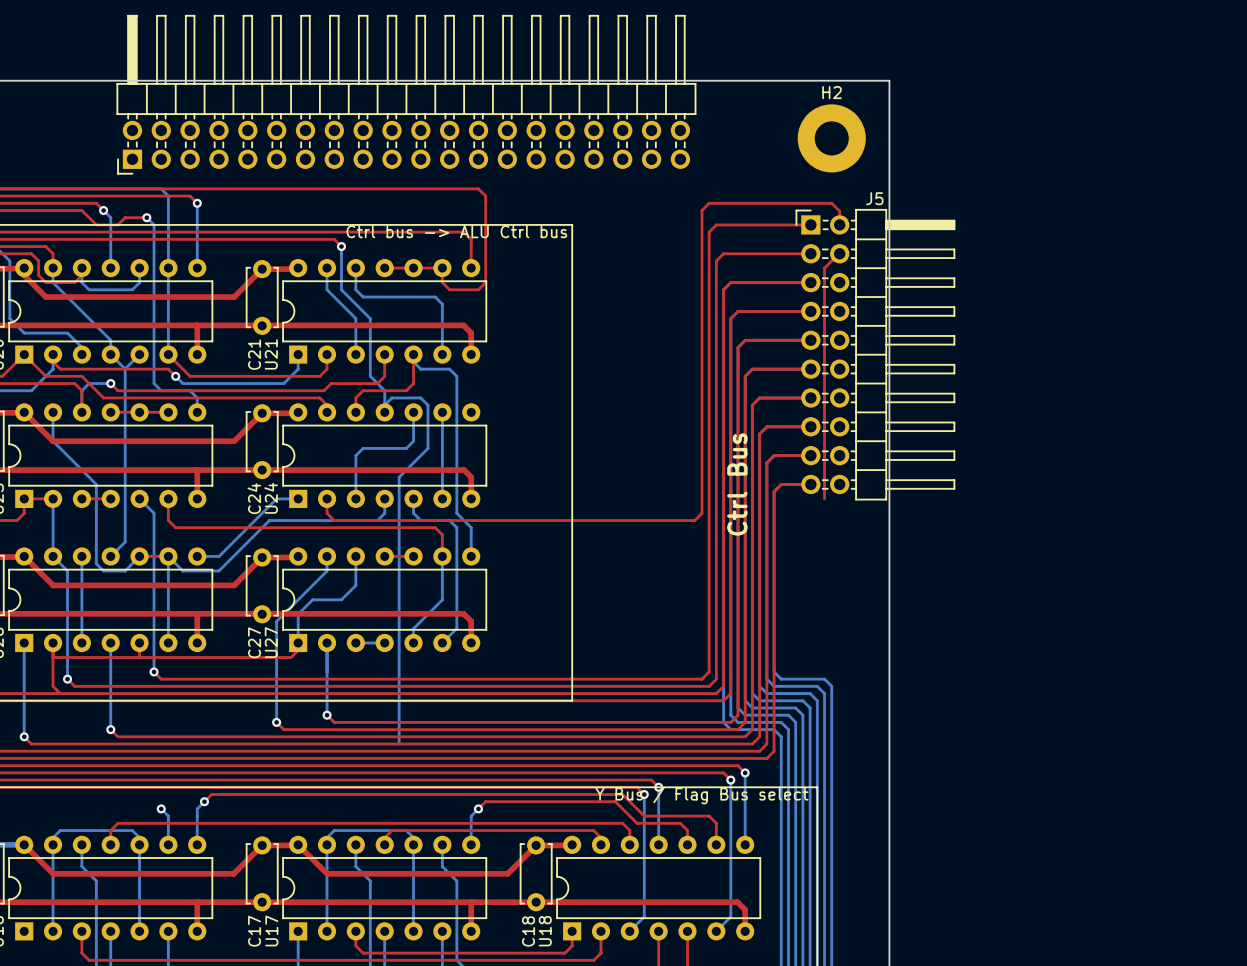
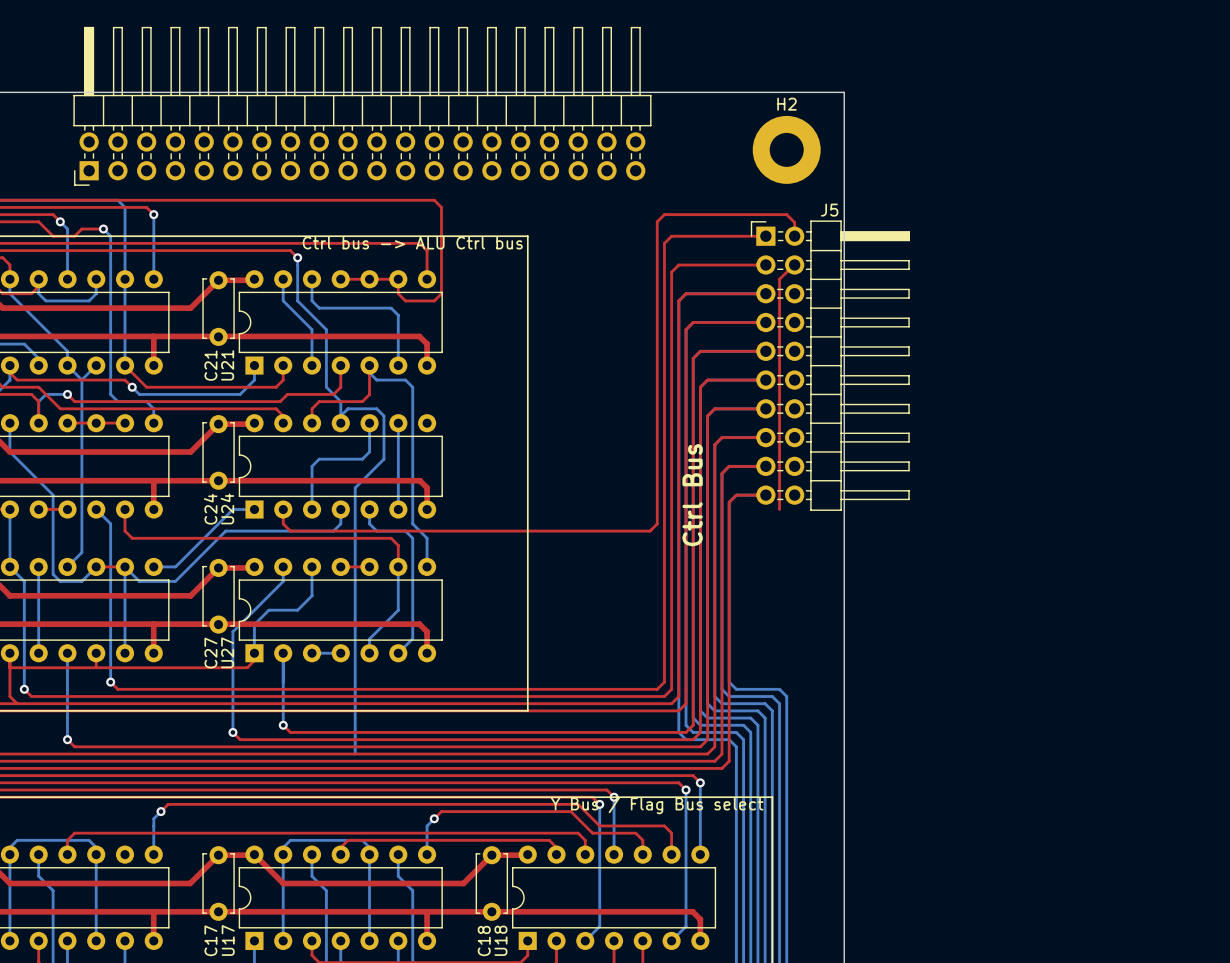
bottom track: (161, 808) (168, 816) (168, 844) -> none
via: (161, 808) -> none

